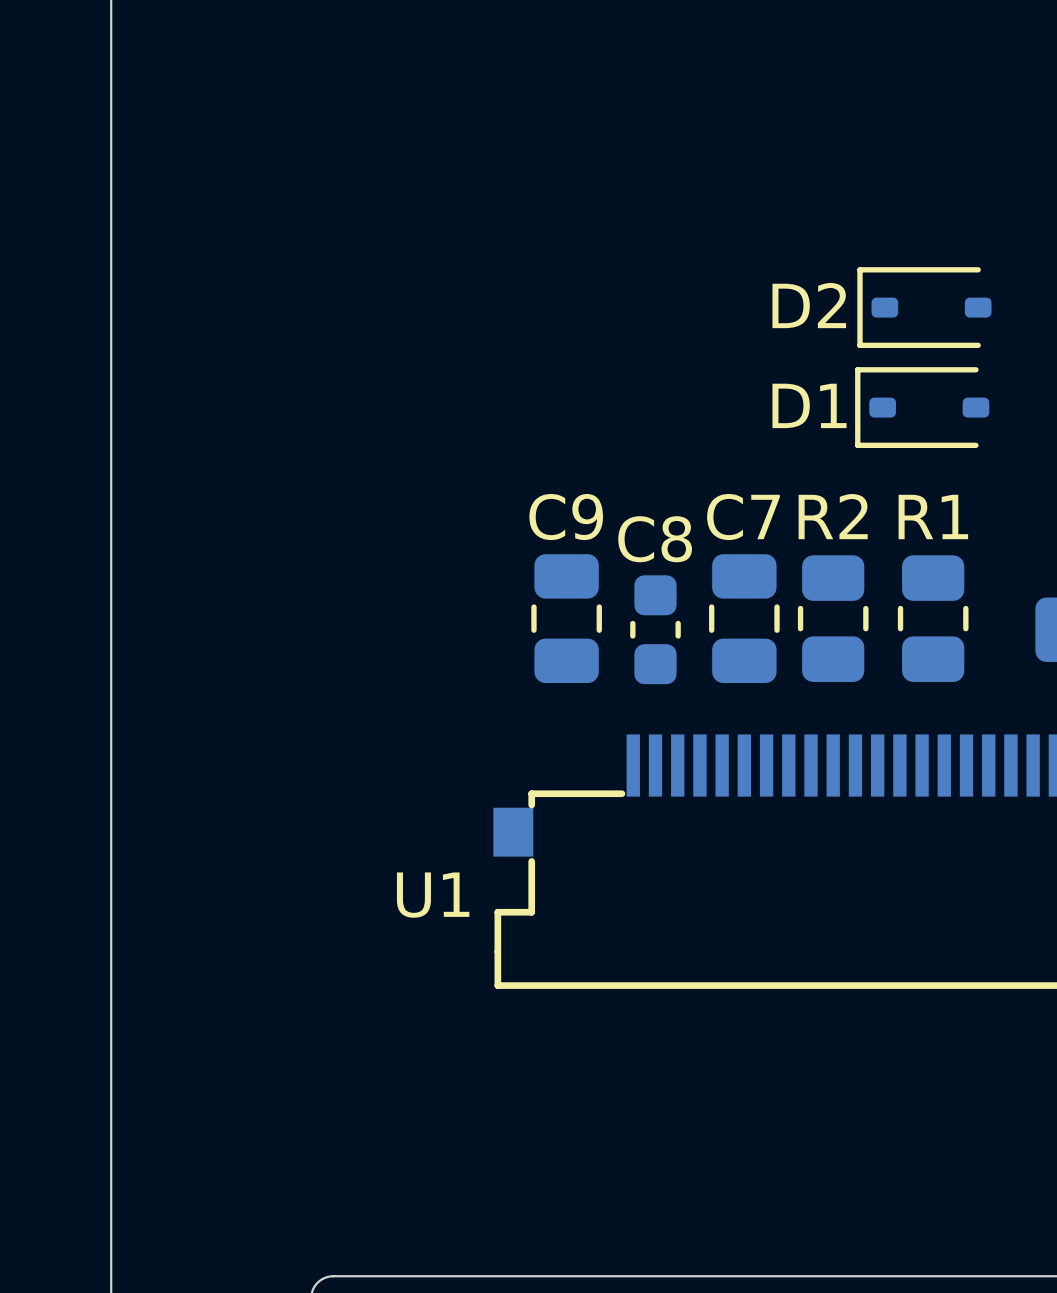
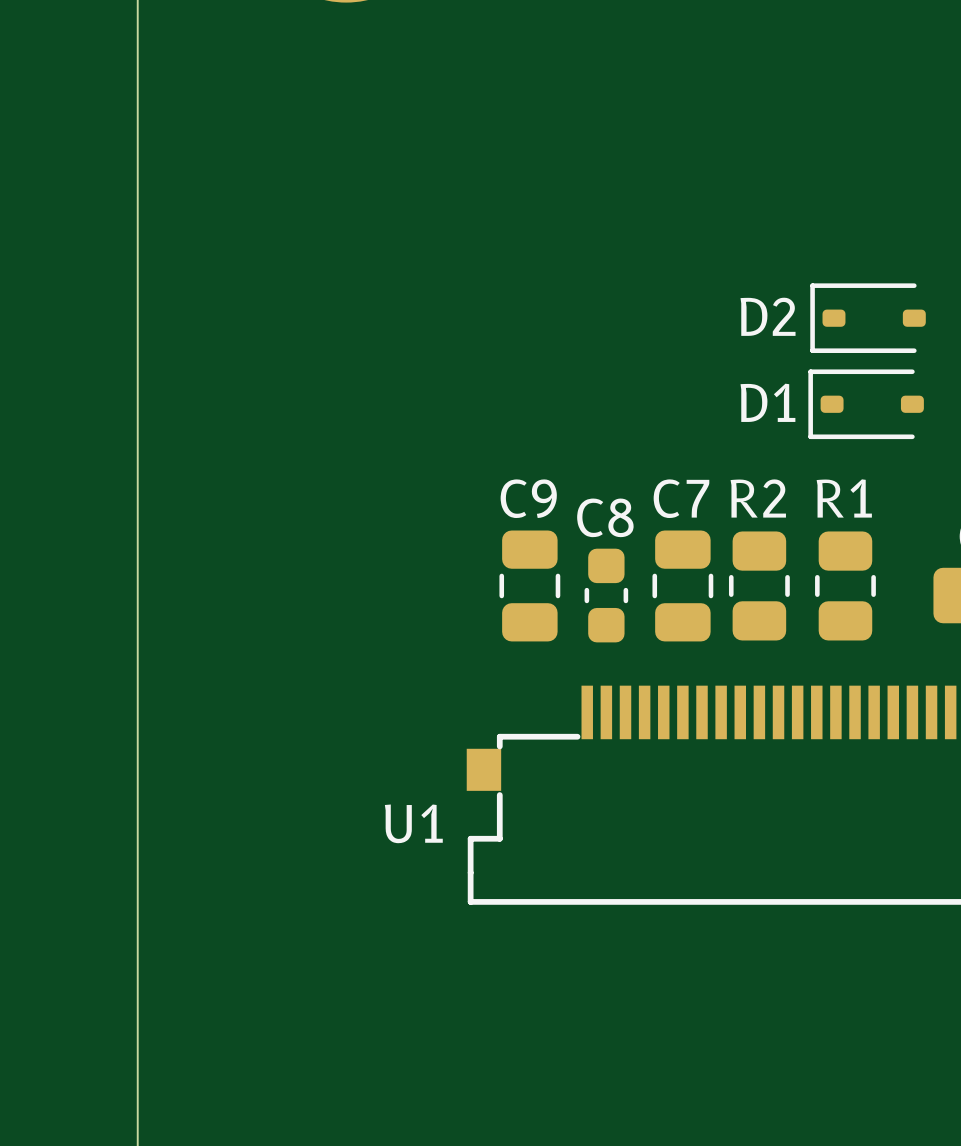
D2 position: (924, 307) -> (868, 318)
D1 position: (922, 407) -> (866, 404)

